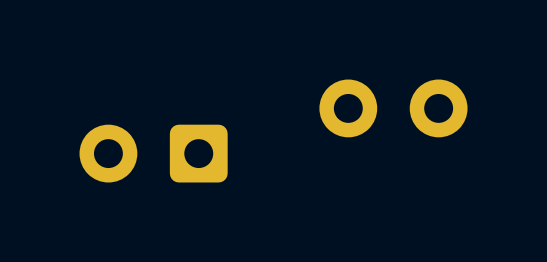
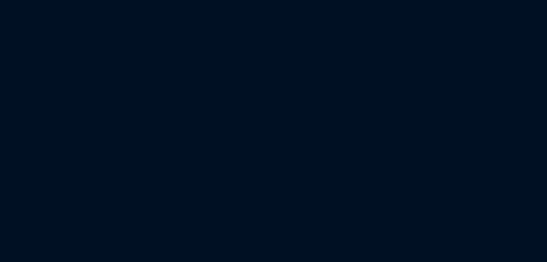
part: (393, 108) -> none
part: (153, 153) -> none

